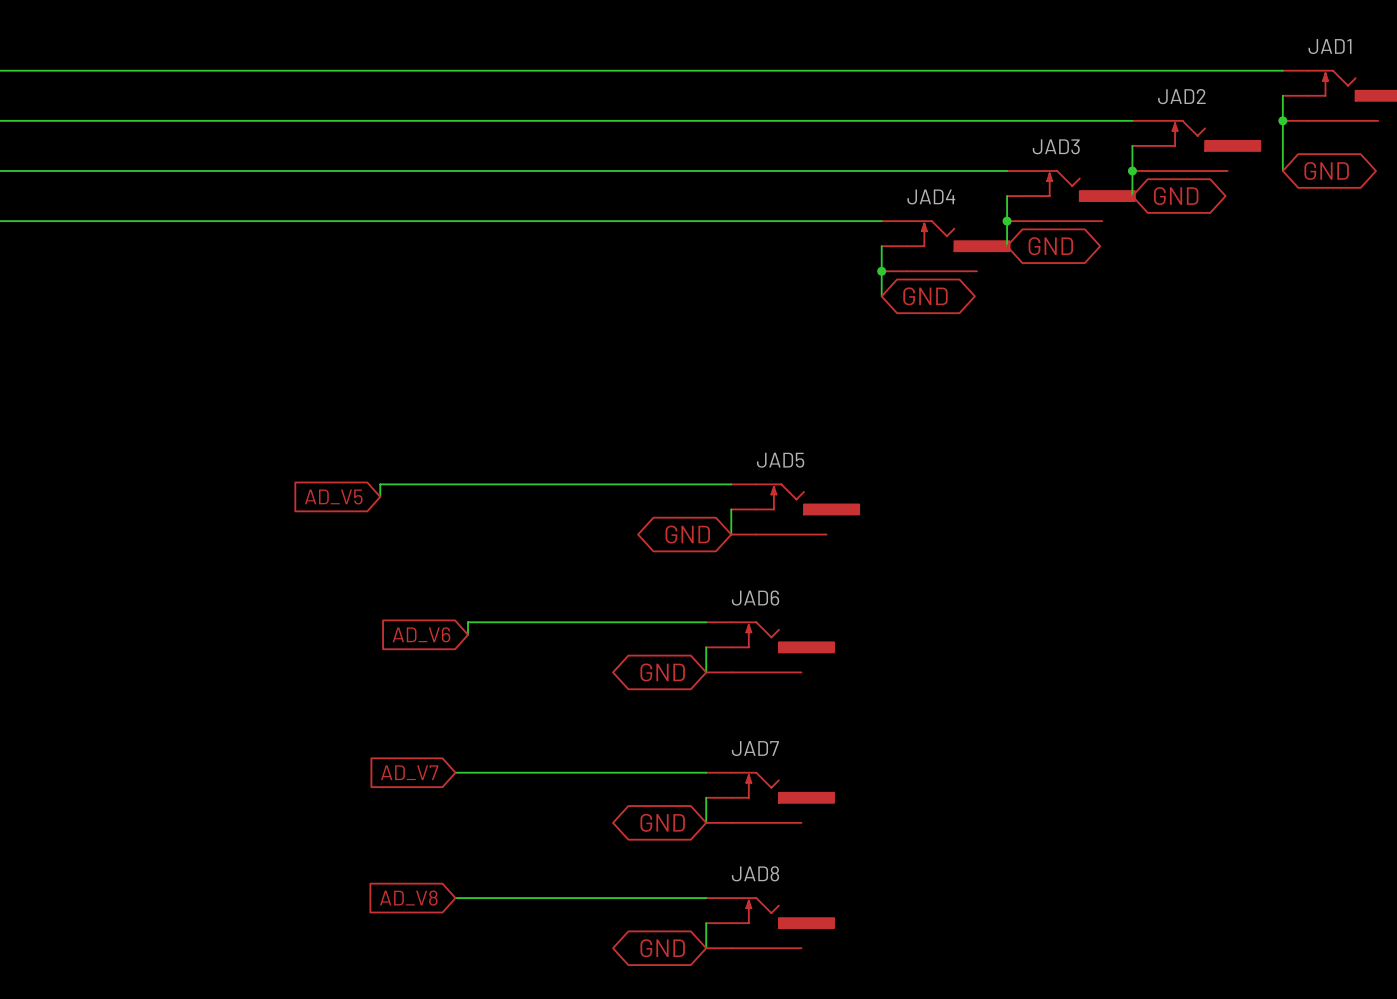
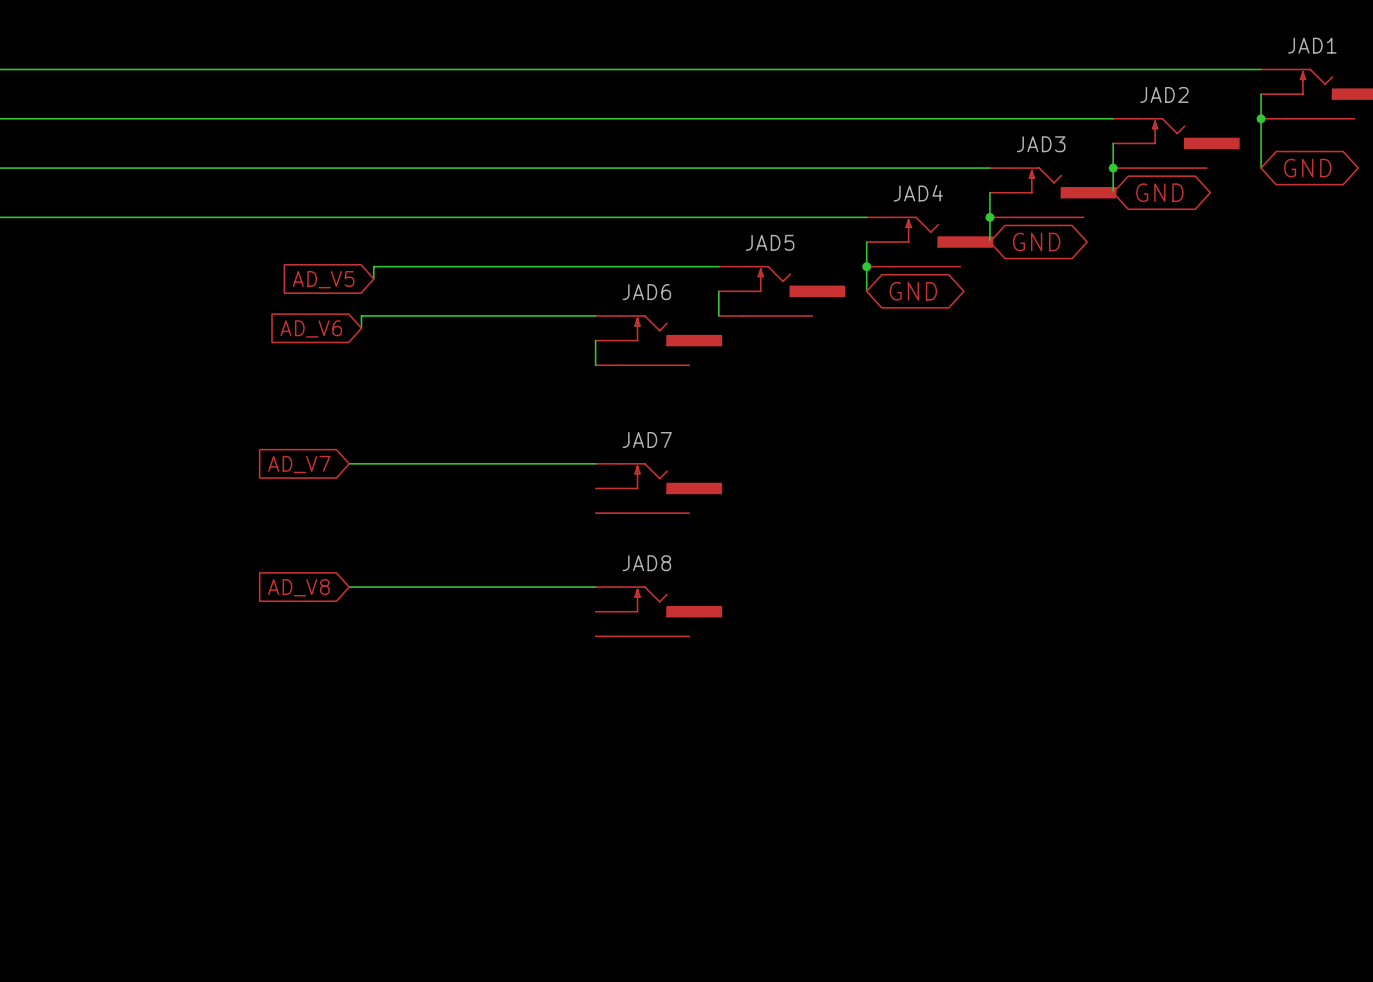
wire: none -> (595, 315) (361, 315) (361, 328)
global label: none -> AD_V6 (311, 328)
wire: none -> (595, 340) (595, 365)
global label: none -> AD_V7 (299, 464)
wire: none -> (349, 463) (595, 463)
wire: (731, 484) (380, 484) (380, 496) -> (718, 266) (373, 266) (373, 278)
global label position: AD_V5 (333, 497) -> AD_V5 (323, 279)
wire: (731, 509) (731, 534) -> (718, 291) (718, 315)
JAD5 position: (795, 509) -> (781, 291)
global label: GND (687, 534) -> none
global label: none -> AD_V8 (298, 587)
wire: (706, 622) (468, 622) (468, 634) -> none
global label: AD_V6 (421, 634) -> none
wire: (706, 647) (706, 672) -> none
JAD6 position: (770, 647) -> (658, 340)
global label: GND (662, 672) -> none
global label: AD_V7 (409, 772) -> none
wire: (455, 772) (706, 772) -> (349, 587) (595, 587)
wire: (706, 797) (706, 822) -> none
JAD7 position: (770, 797) -> (658, 488)
global label: GND (662, 822) -> none
global label: AD_V8 (408, 898) -> none
wire: (455, 898) (706, 898) -> none
wire: (706, 923) (706, 948) -> none
JAD8 position: (770, 923) -> (658, 611)
global label: GND (662, 948) -> none

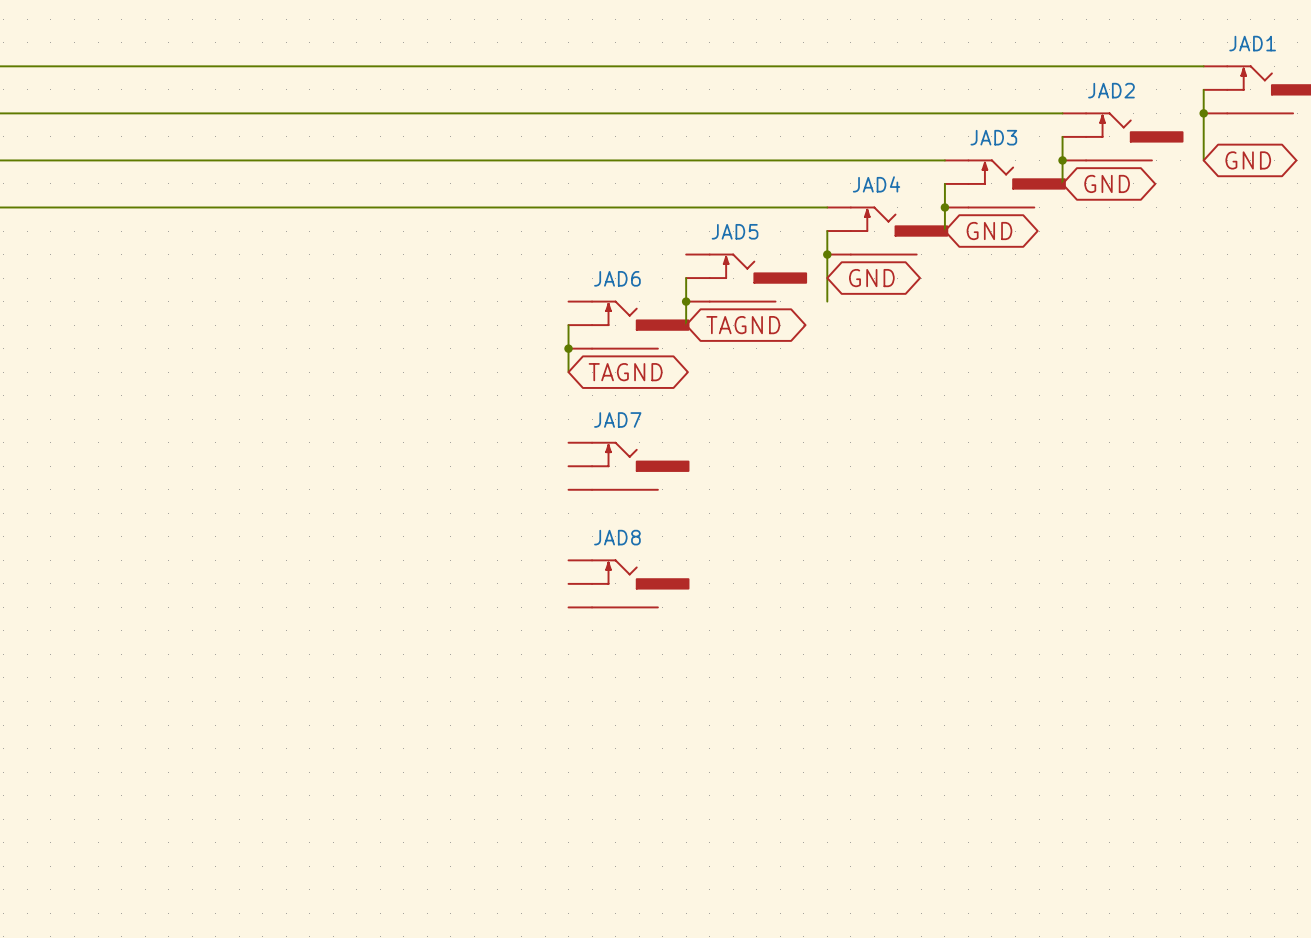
wire: (718, 266) (373, 266) (373, 278) -> none
global label: AD_V5 (323, 279) -> none
wire: none -> (827, 278) (827, 301)
wire: (595, 315) (361, 315) (361, 328) -> none
wire: none -> (686, 301) (686, 325)
junction: none -> (686, 301)
global label: AD_V6 (311, 328) -> none
global label: none -> TAGND (743, 325)
wire: none -> (568, 348) (568, 372)
junction: none -> (568, 348)
global label: none -> TAGND (625, 372)
wire: (349, 463) (595, 463) -> none
global label: AD_V7 (299, 464) -> none
global label: AD_V8 (298, 587) -> none
wire: (349, 587) (595, 587) -> none

